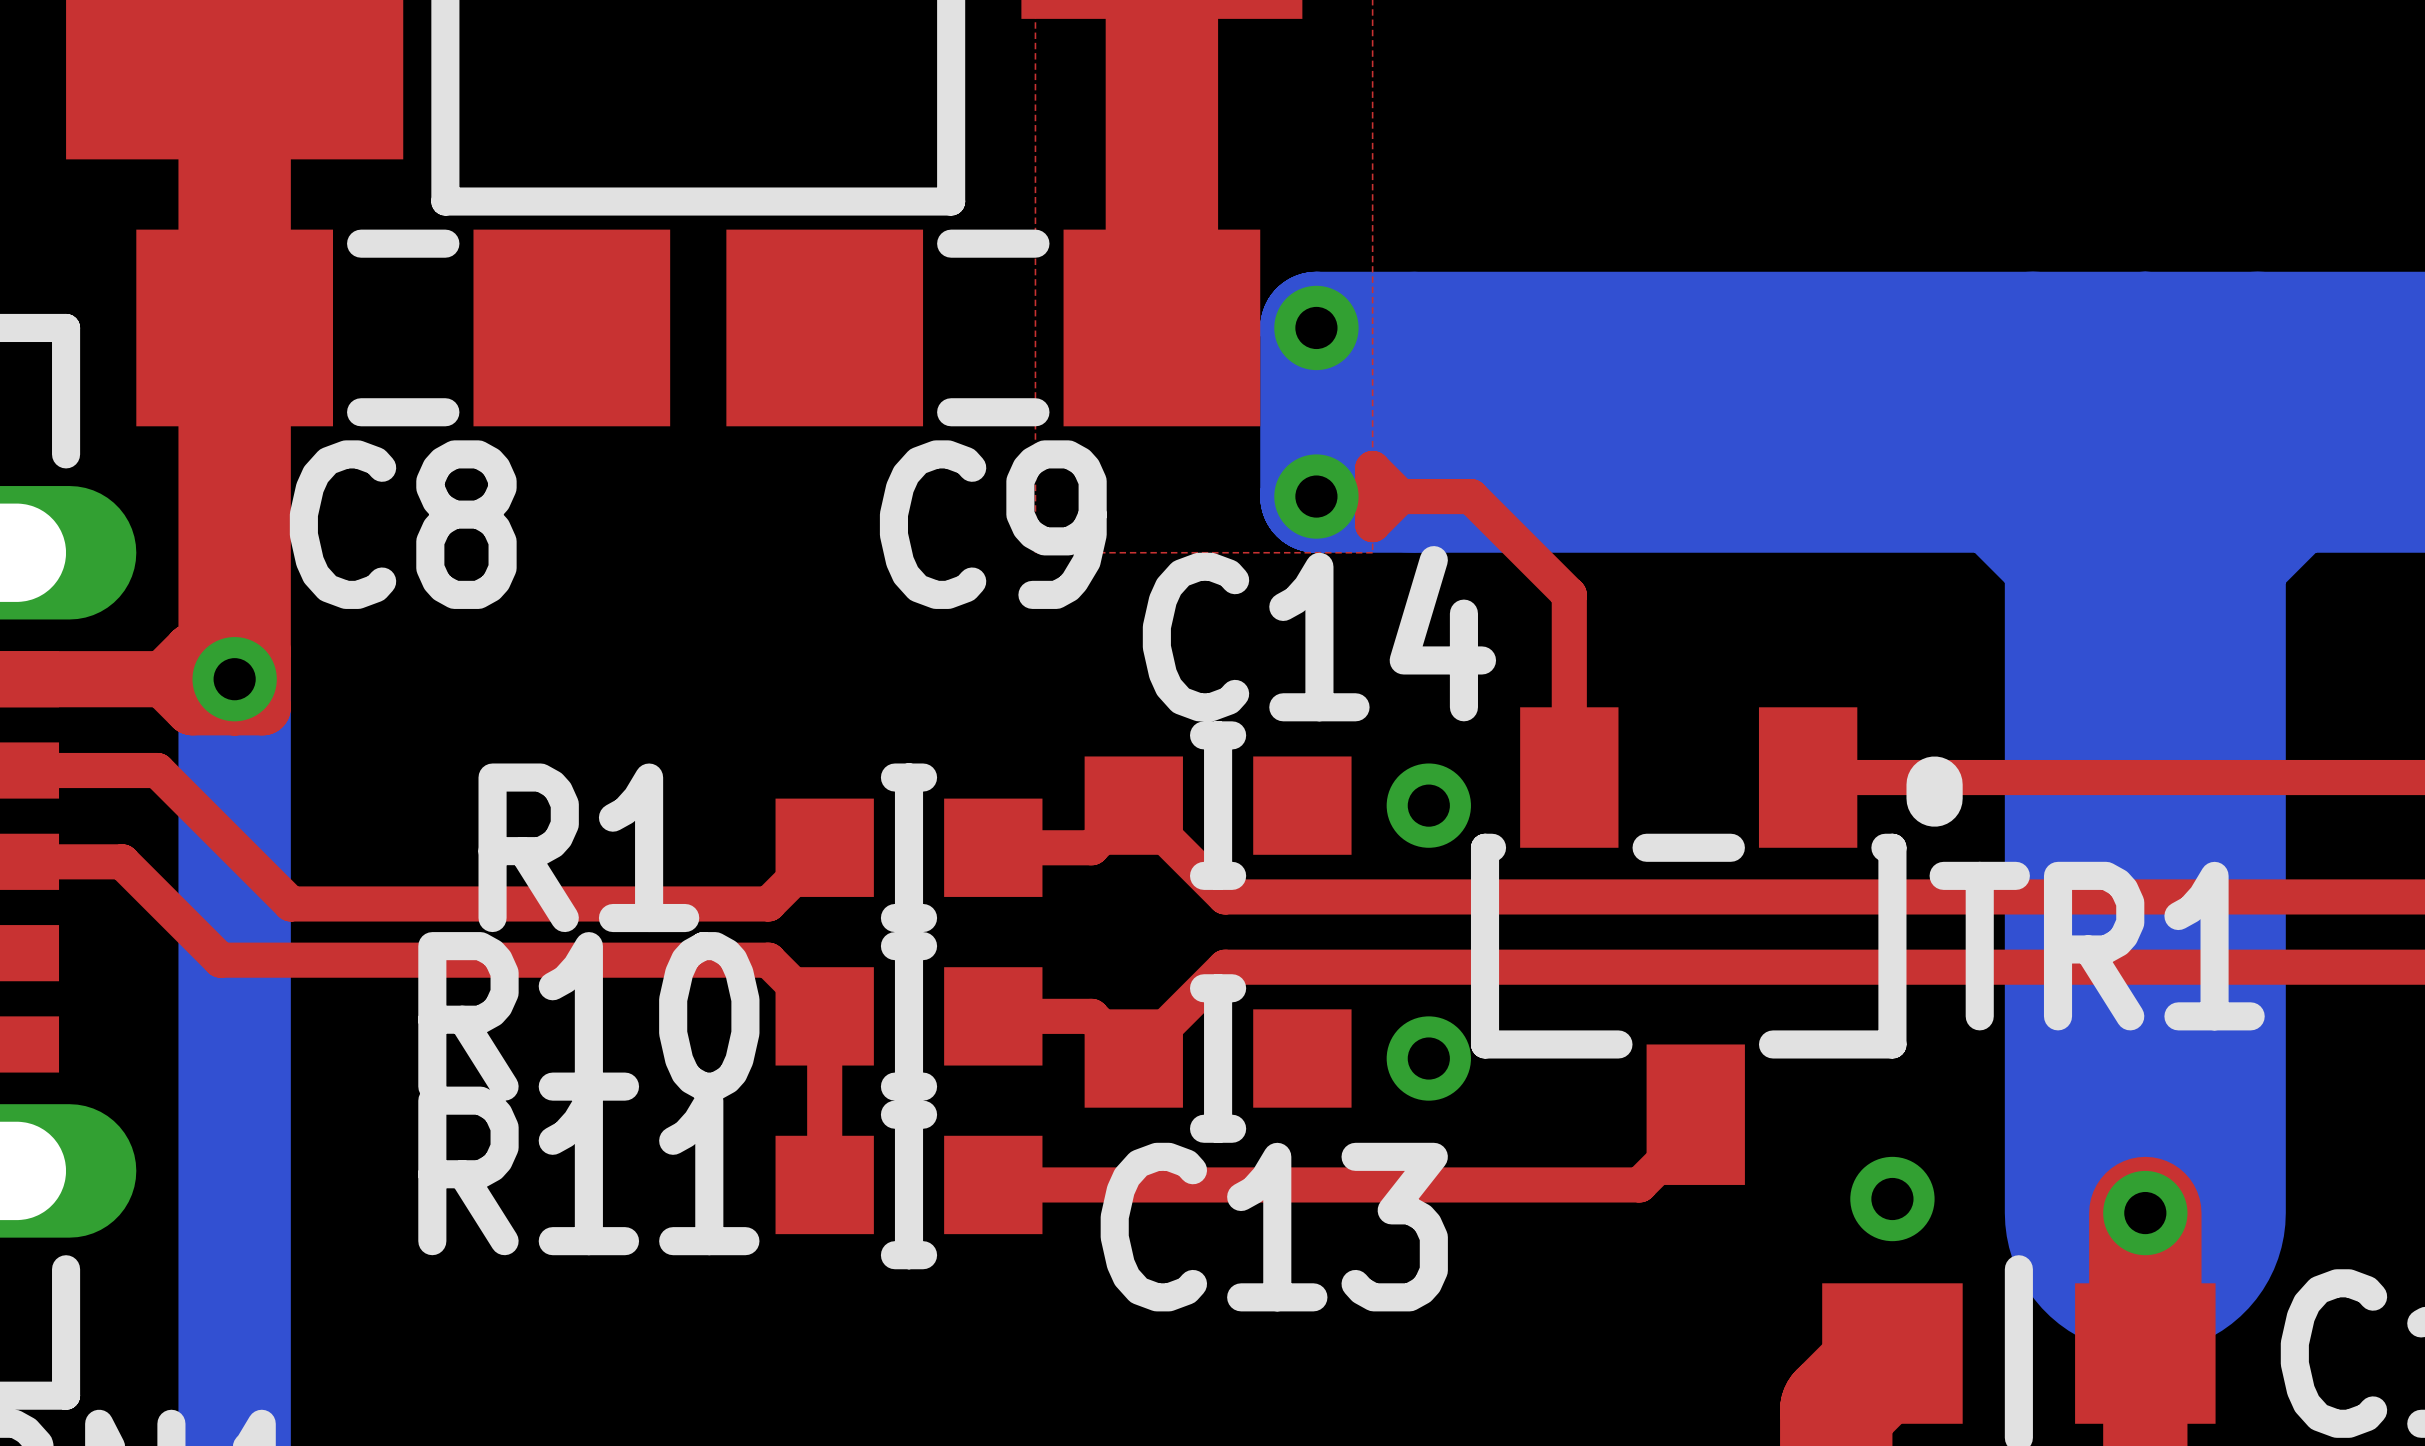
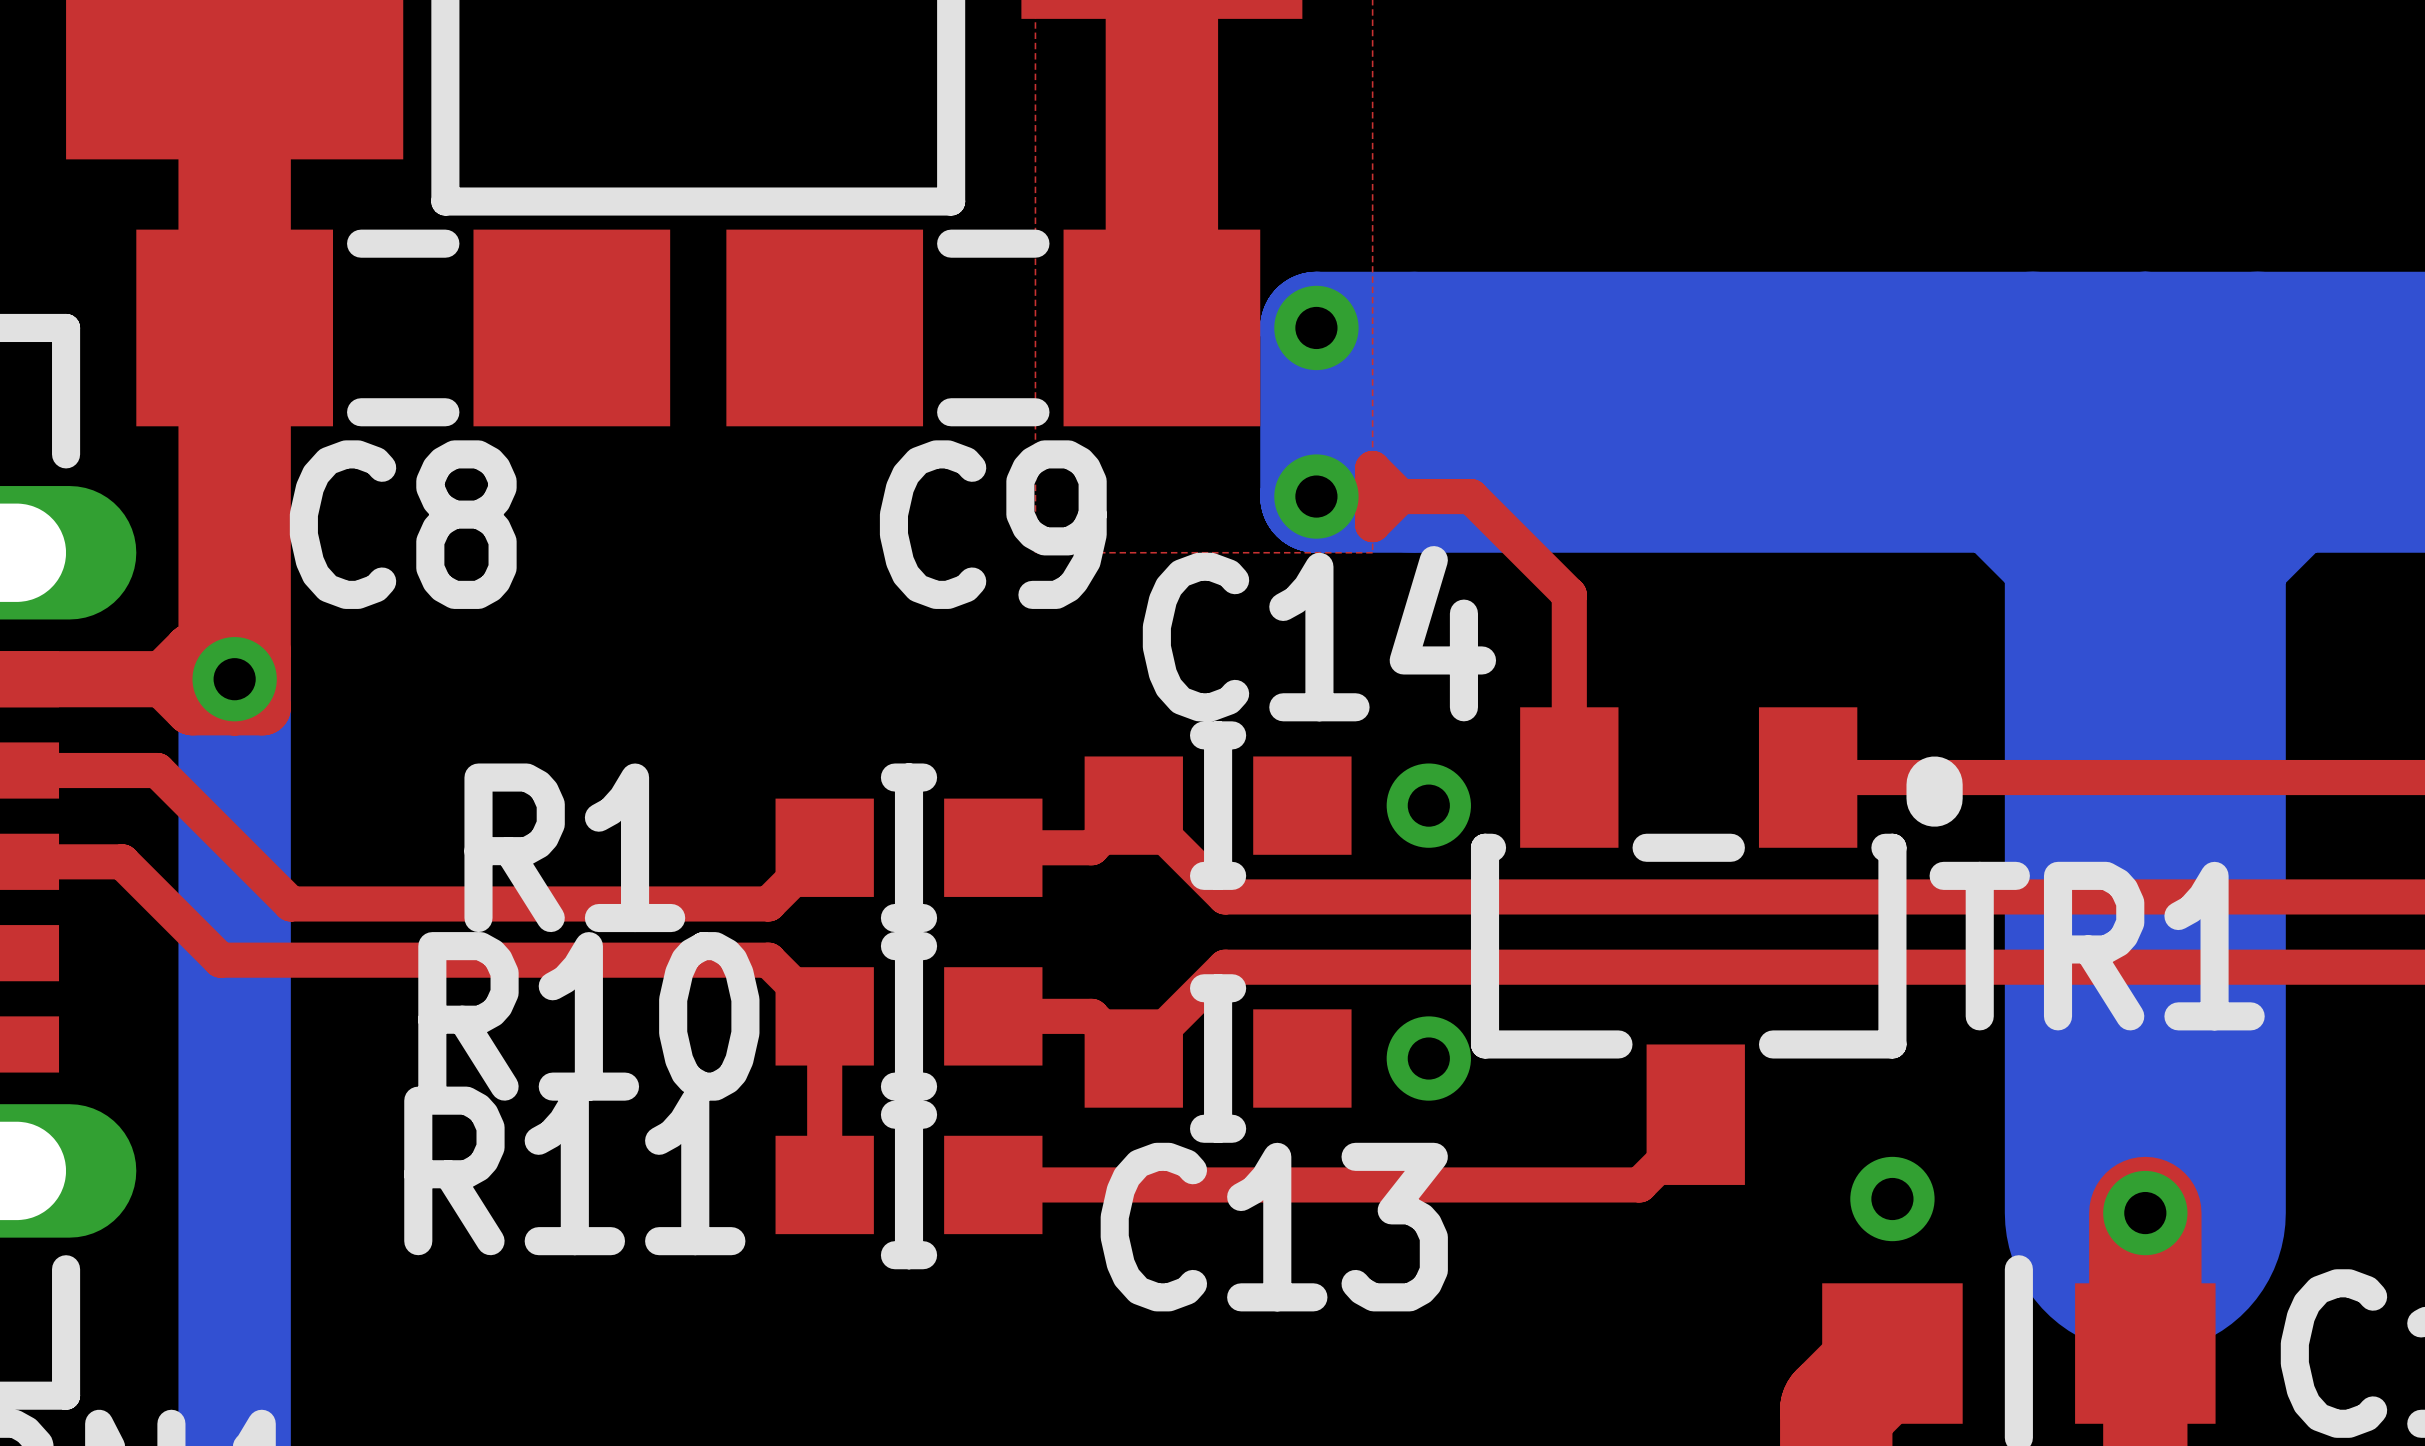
R1 name position: R1 (588, 847) -> R1 (574, 847)
R11 name position: R11 (588, 1170) -> R11 (574, 1170)

